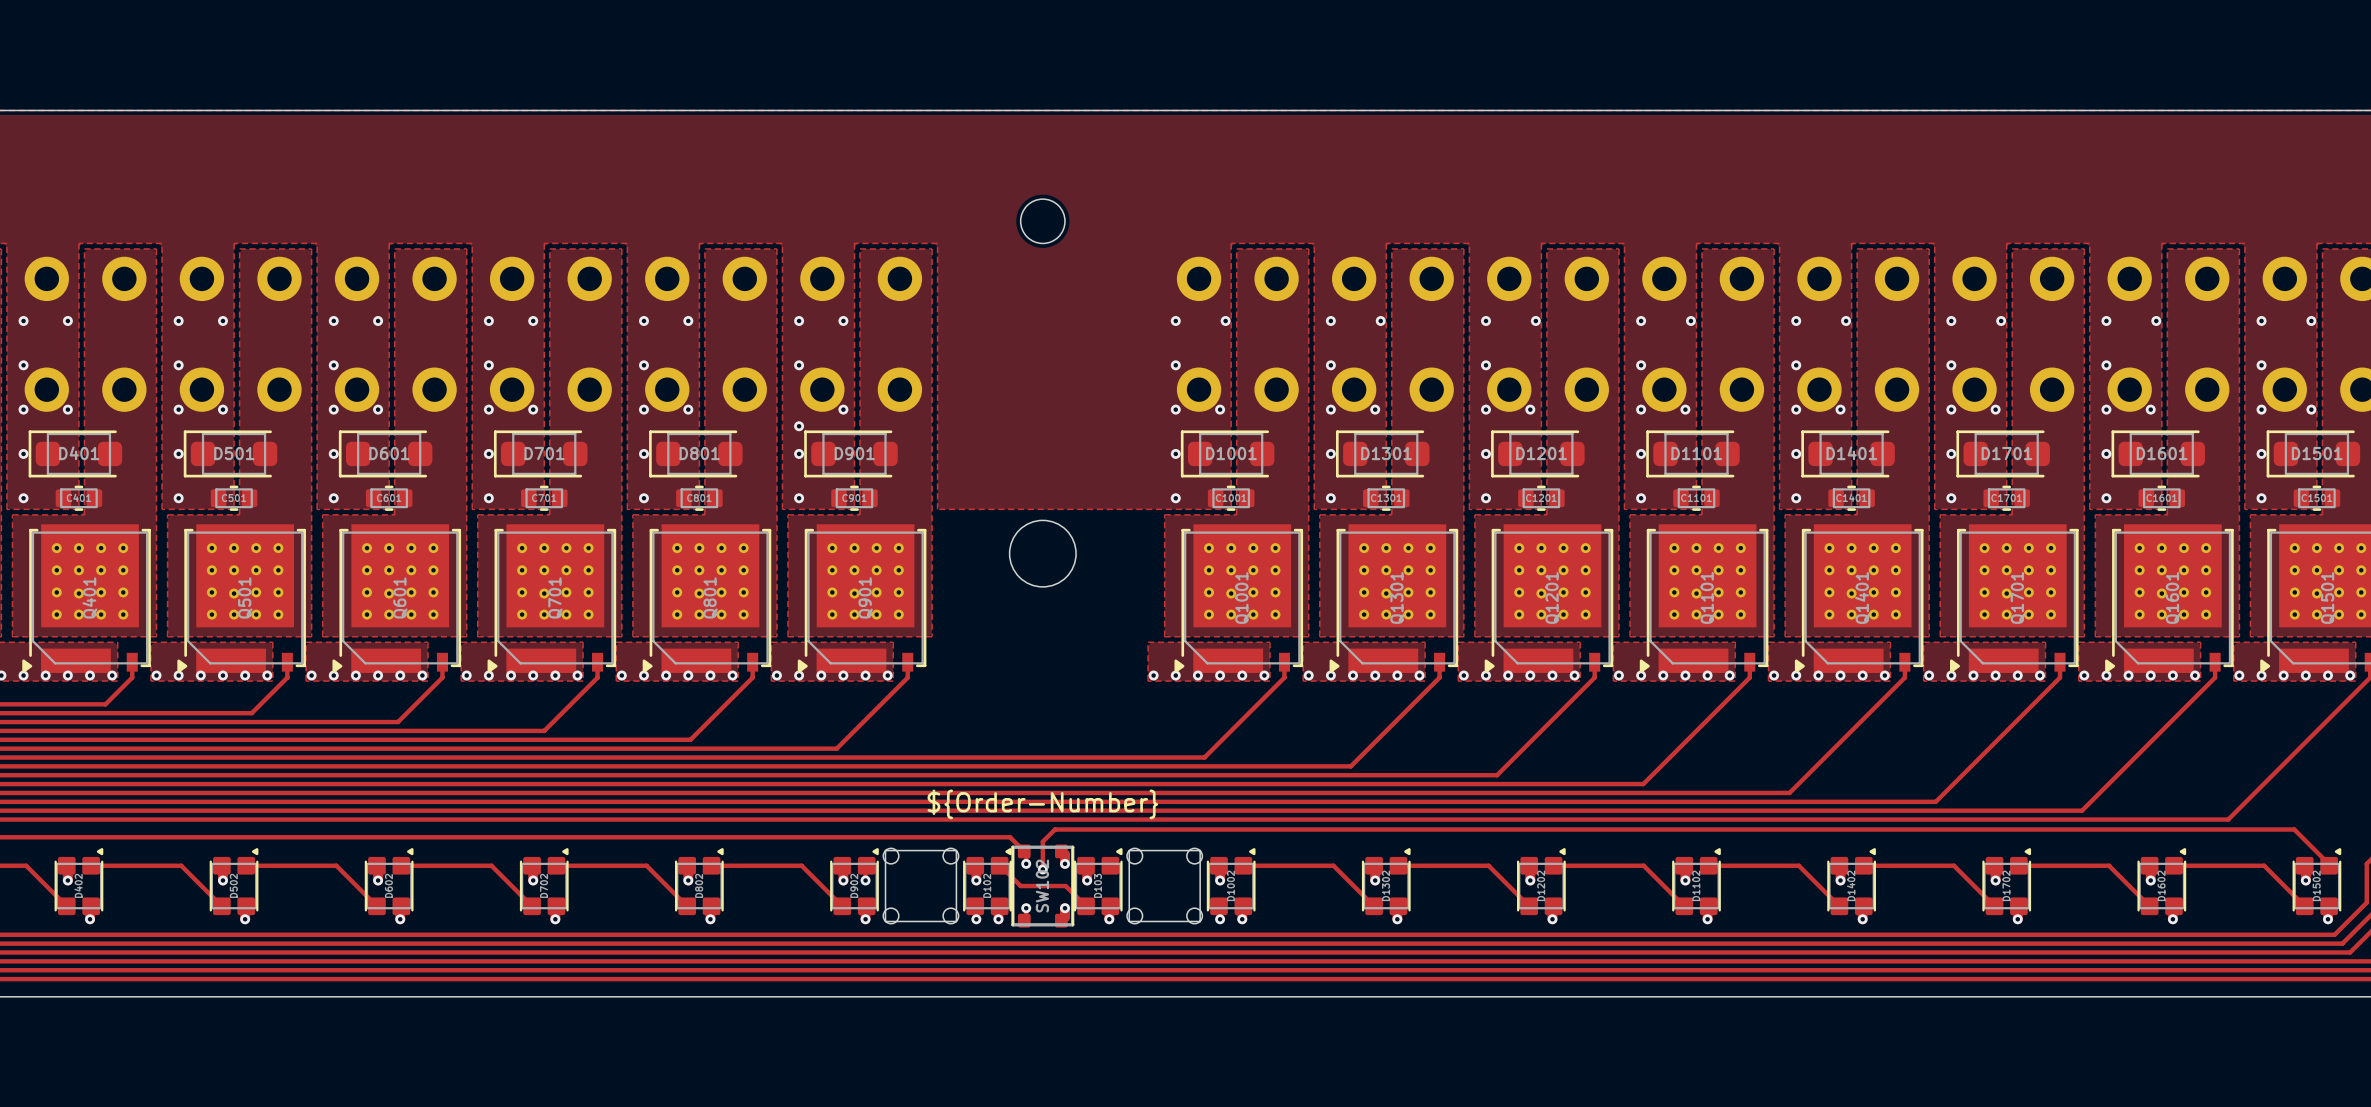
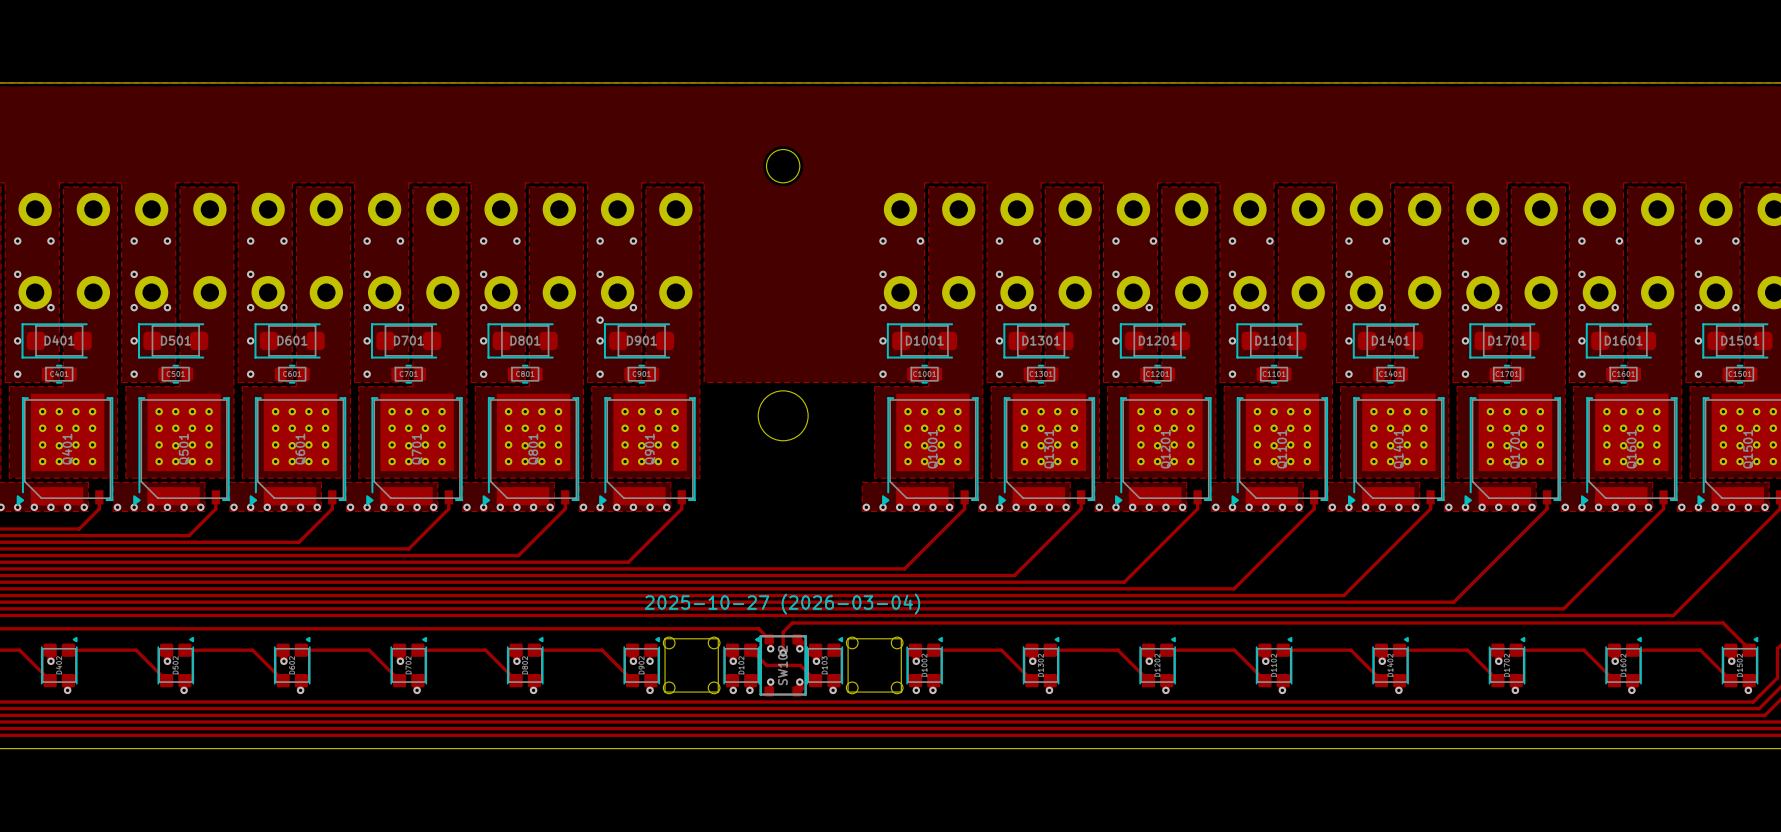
drawing shape: [927, 789, 1159, 820] -> [645, 593, 921, 615]

